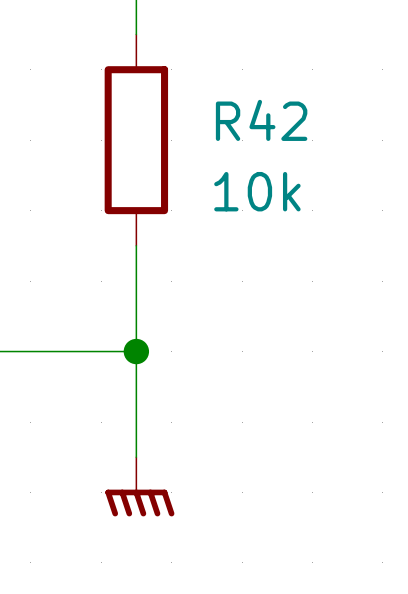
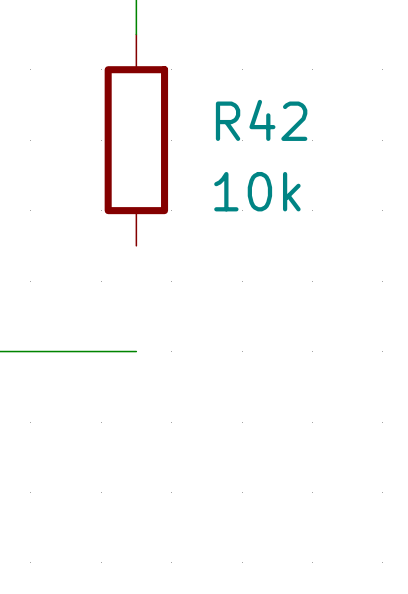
wire: (136, 245) (136, 457) -> none
junction: (136, 351) -> none
power symbol: (139, 486) -> none

